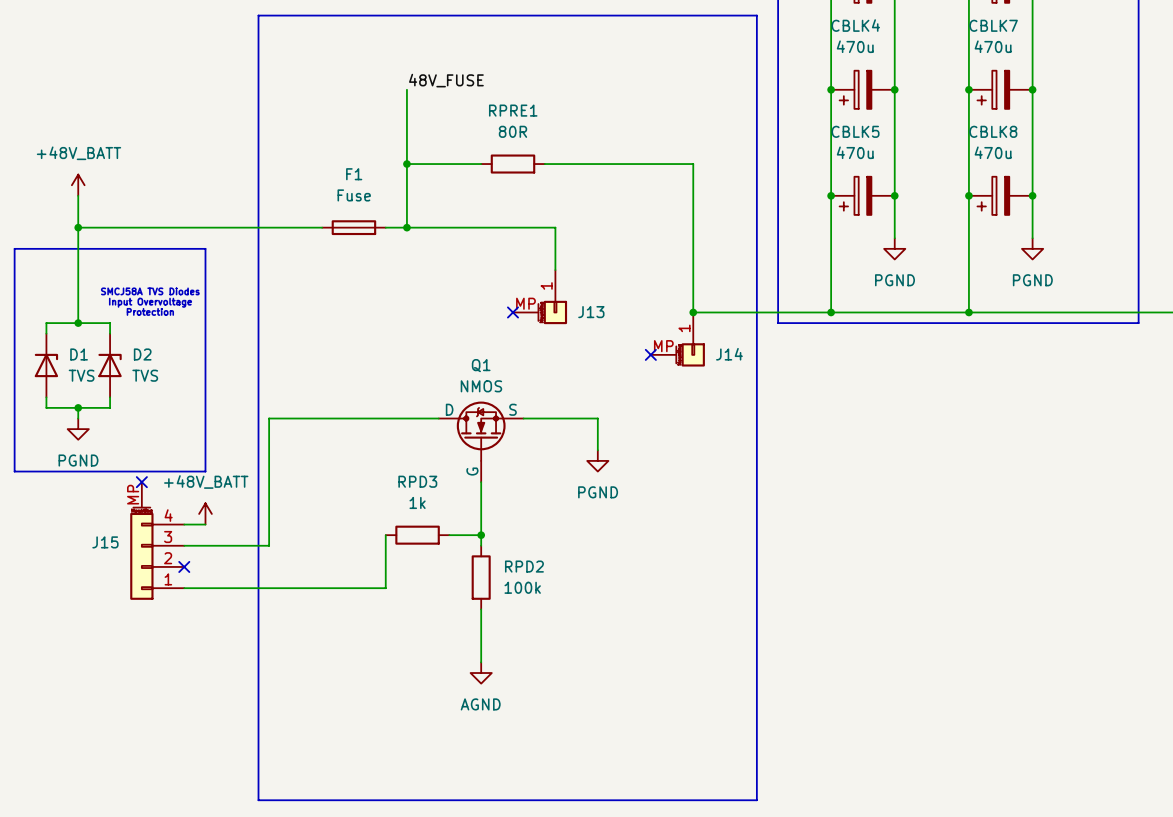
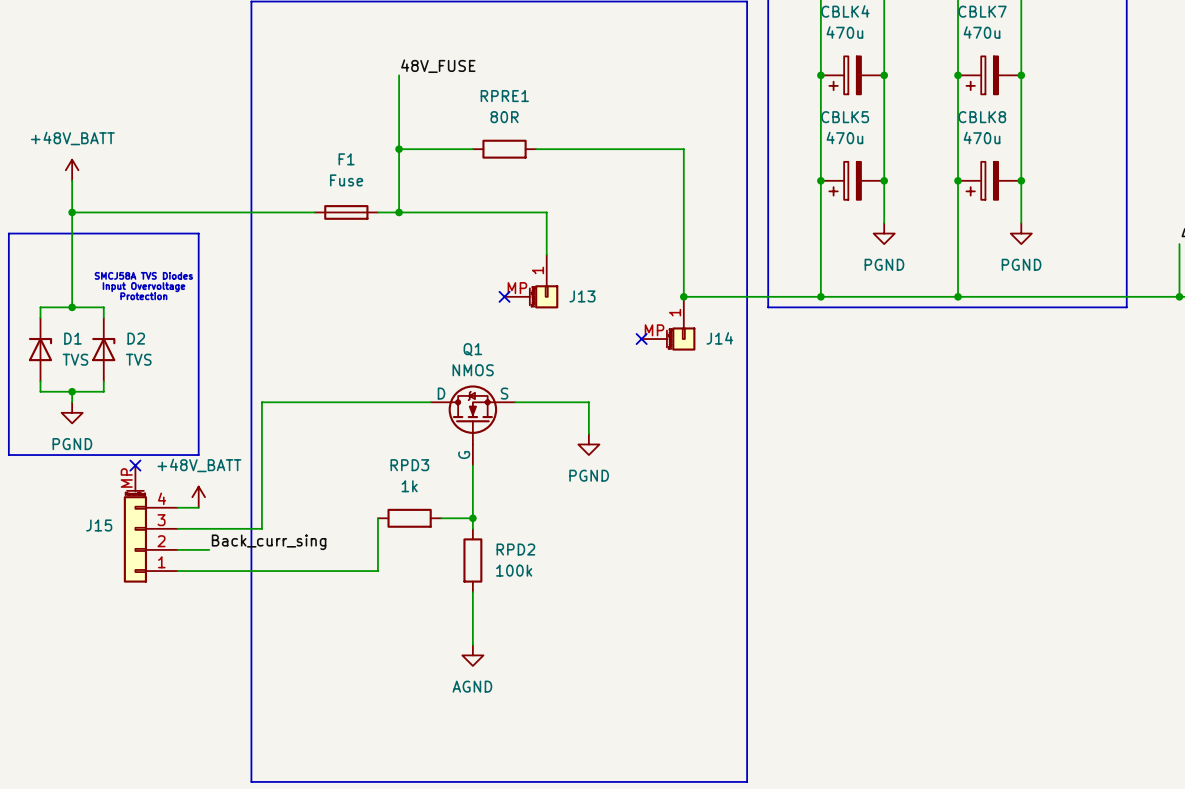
label: none -> Back_curr_sing (269, 542)
wire: none -> (177, 549) (209, 549)
no-connect mark: (184, 566) -> none

